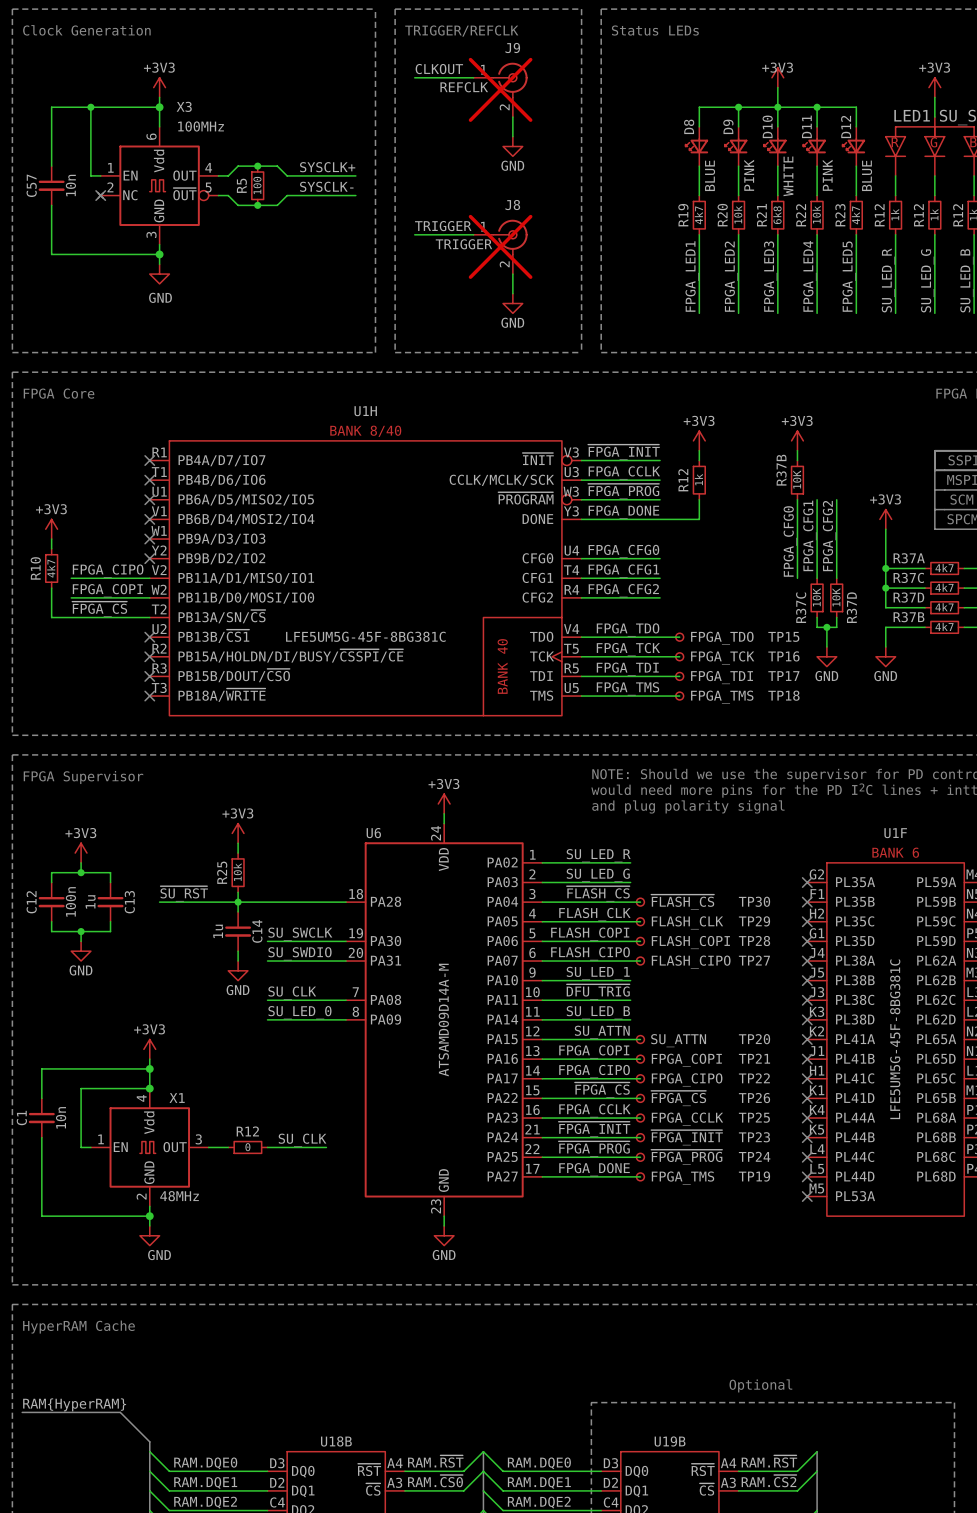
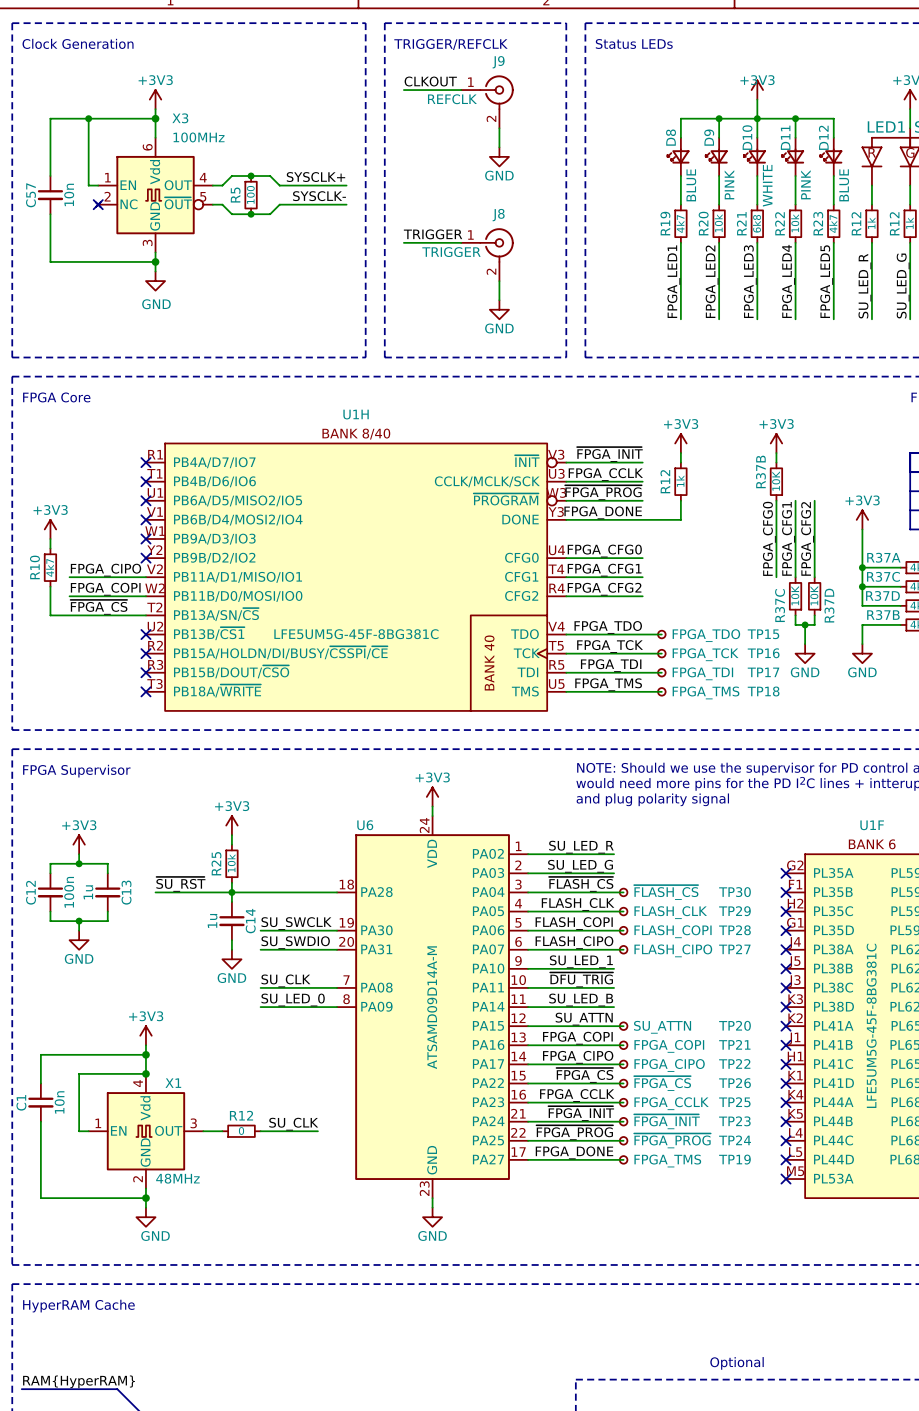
J9 do-not-place cross: (500, 89) -> none
J8 do-not-place cross: (500, 246) -> none

